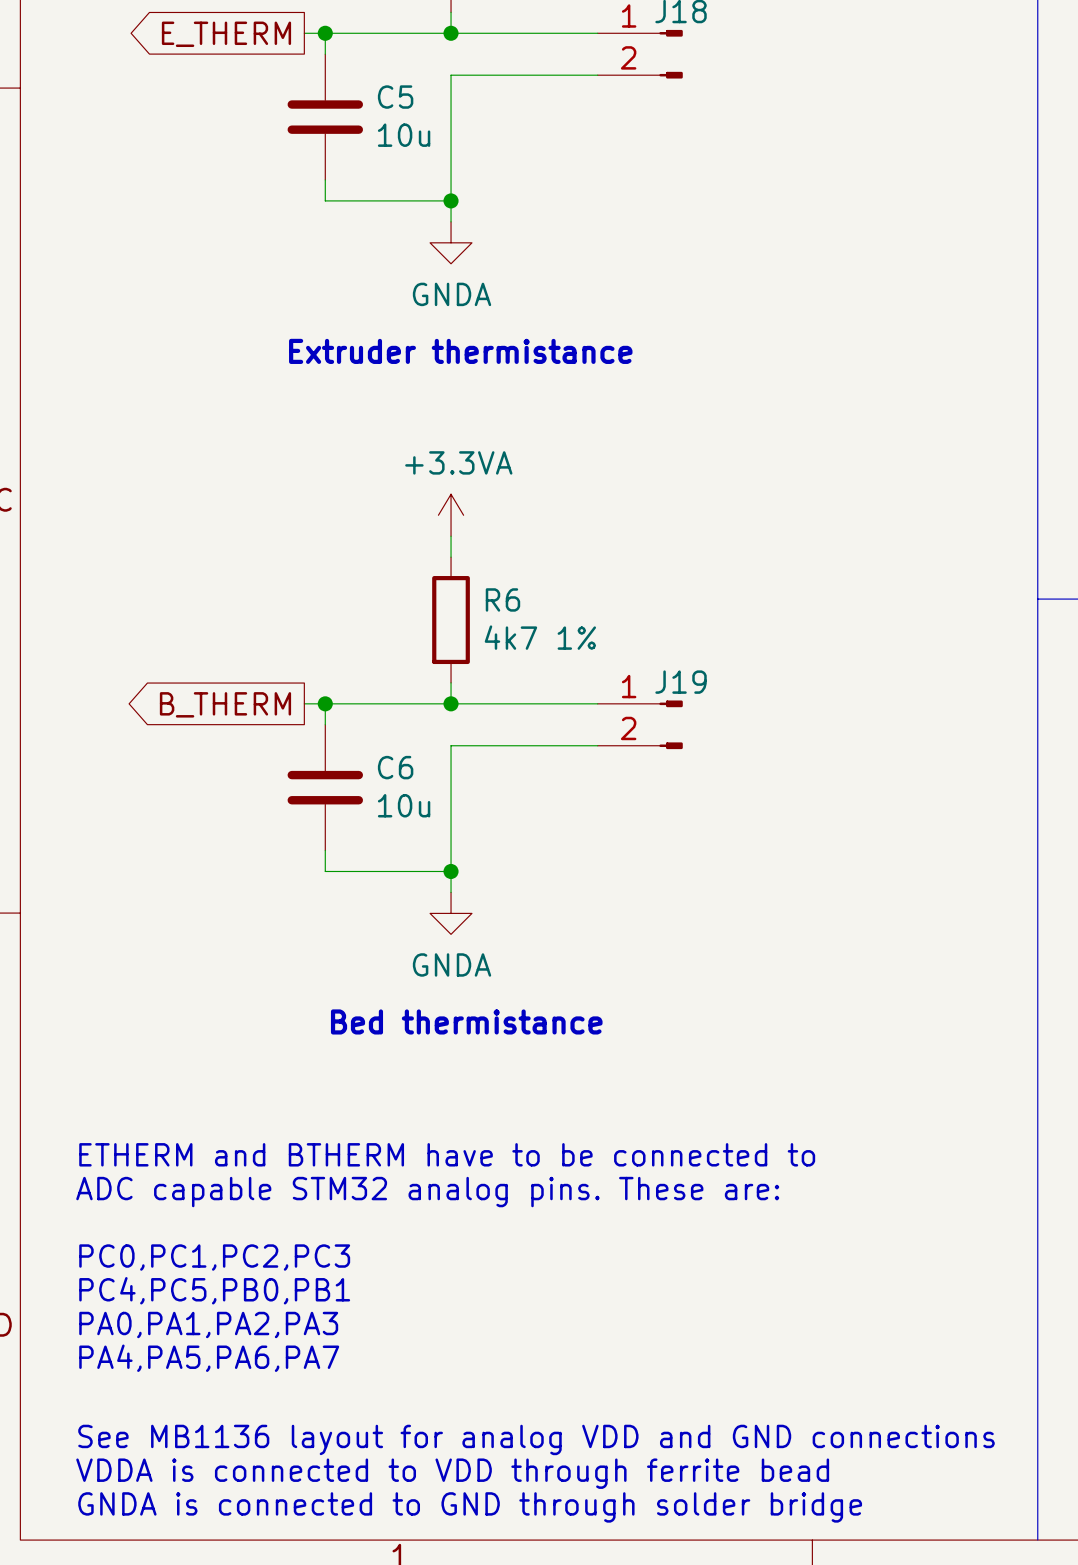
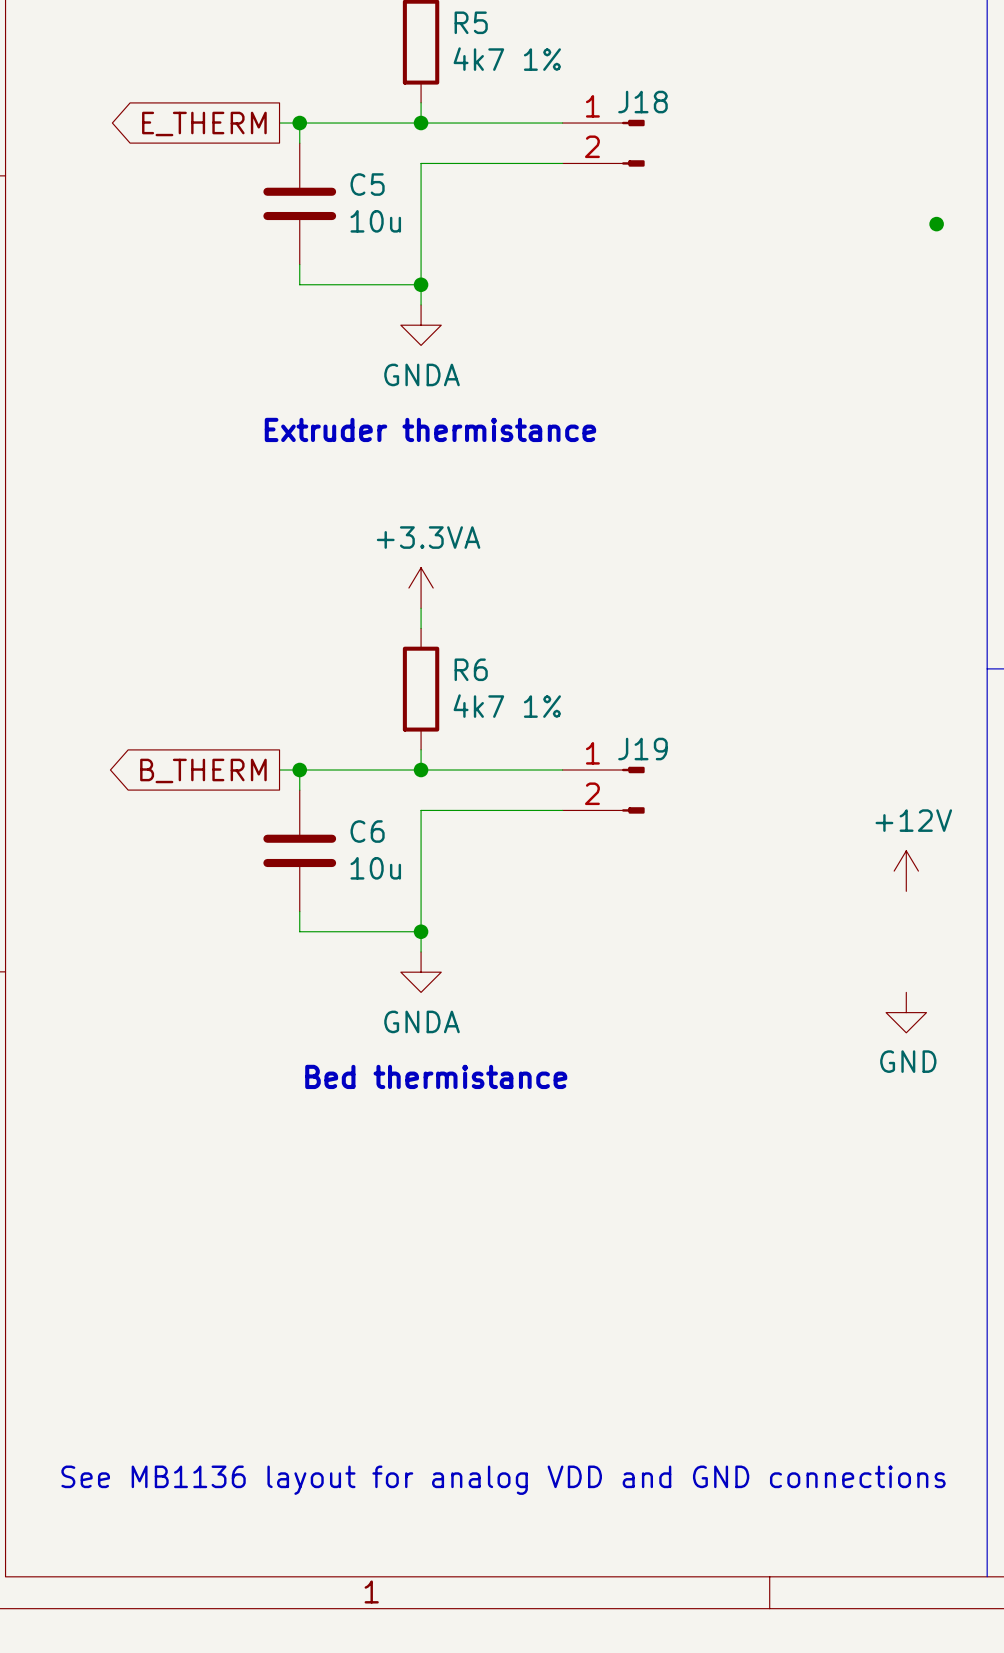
junction: none -> (936, 224)
power symbol: none -> +12V (906, 871)
power symbol: none -> GND (906, 1012)
text: ETHERM and BTHERM have to be connected to (447, 1154) -> none
text: ADC capable STM32 analog pins. These are: (427, 1192) -> none
text: PC0,PC1,PC2,PC3 (214, 1257) -> none
text: PC4,PC5,PB0,PB1 (214, 1290) -> none
text: PA0,PA1,PA2,PA3 (208, 1325) -> none
text: PA4,PA5,PA6,PA7 (209, 1358) -> none
text: VDDA is connected to VDD through ferrite bead (452, 1473) -> none
text: GNDA is connected to GND through solder bridge (470, 1507) -> none

